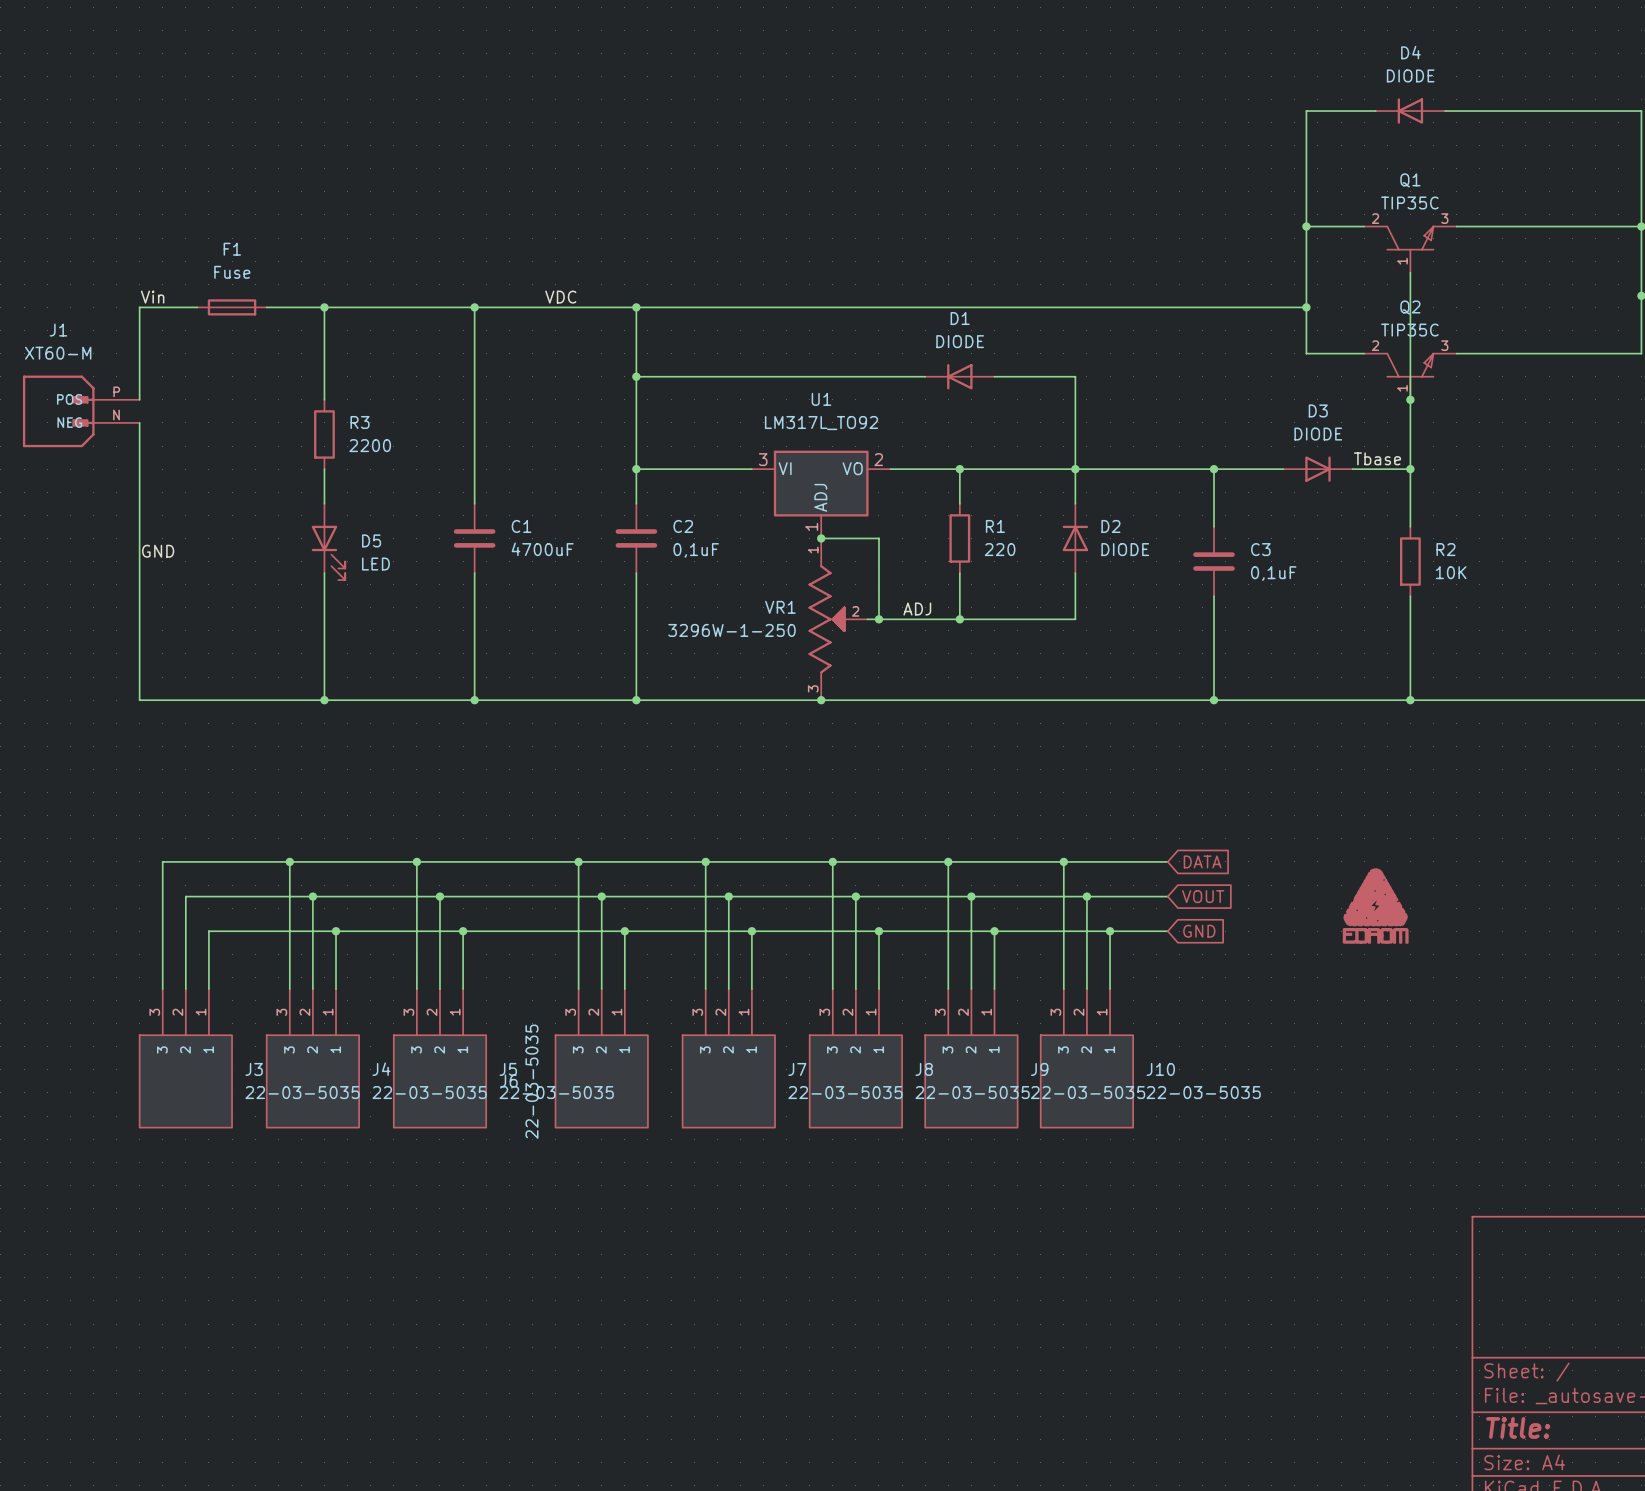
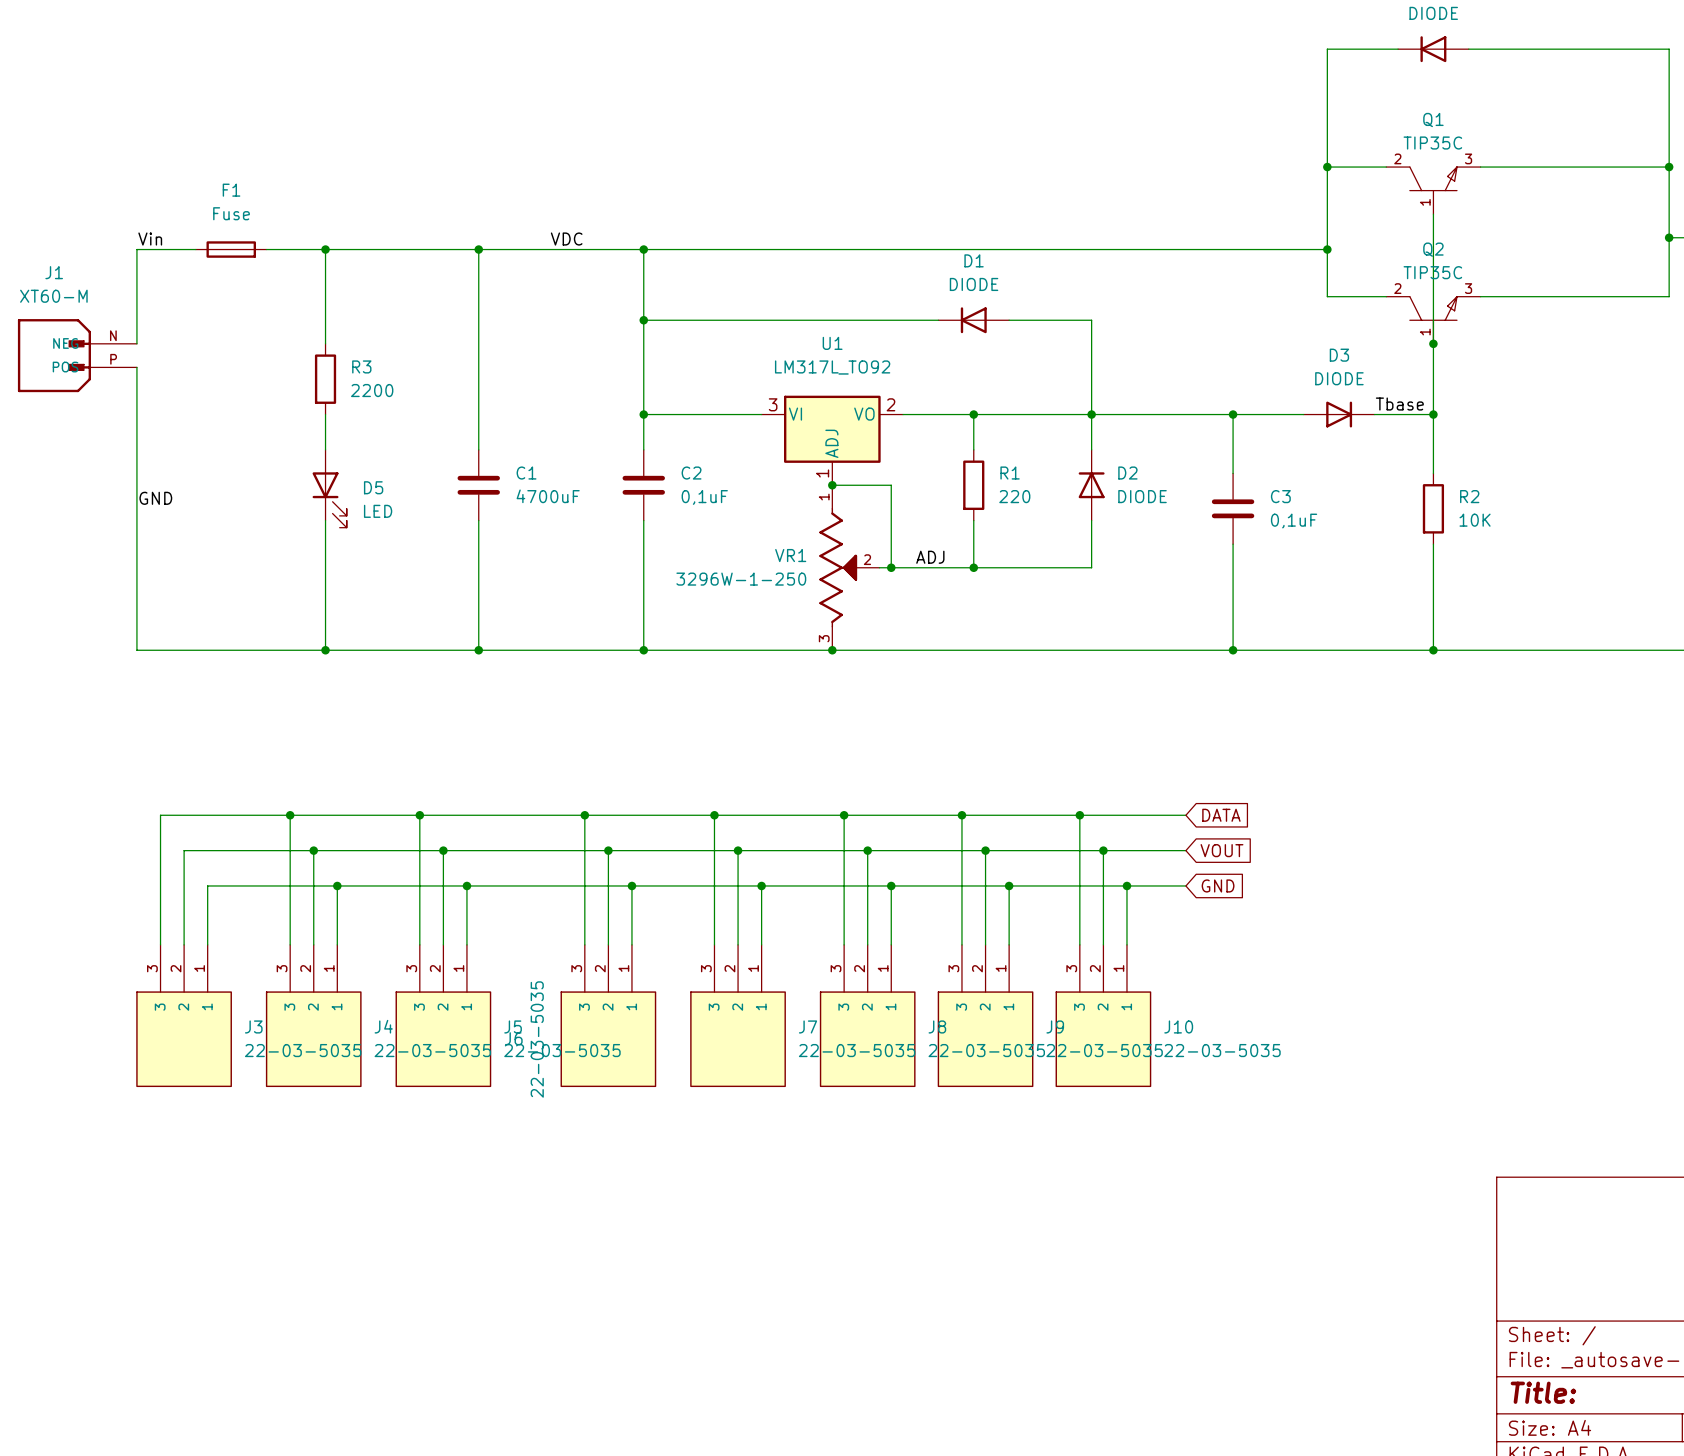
J1 flip: as is (58, 411) -> up-down (54, 355)
power symbol: (1375, 906) -> none

